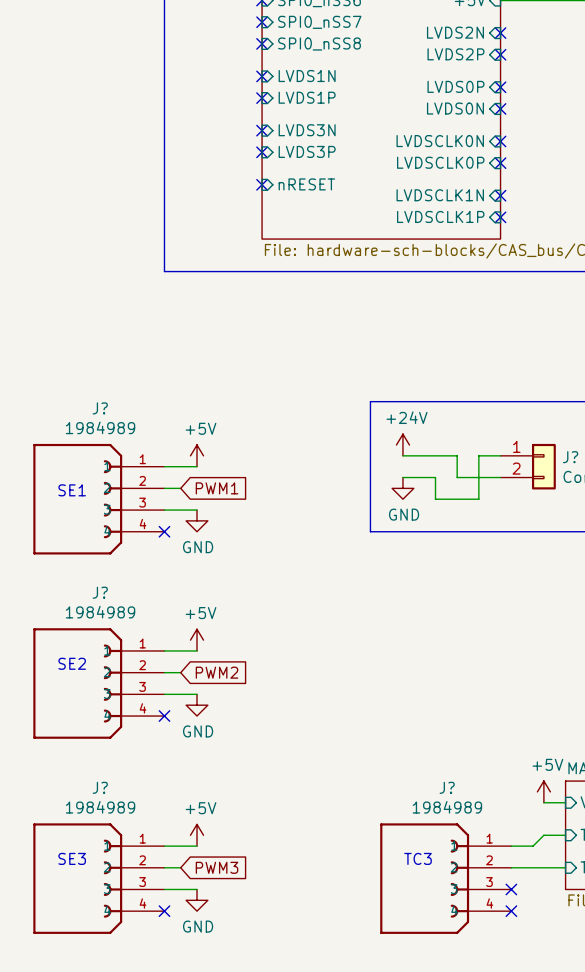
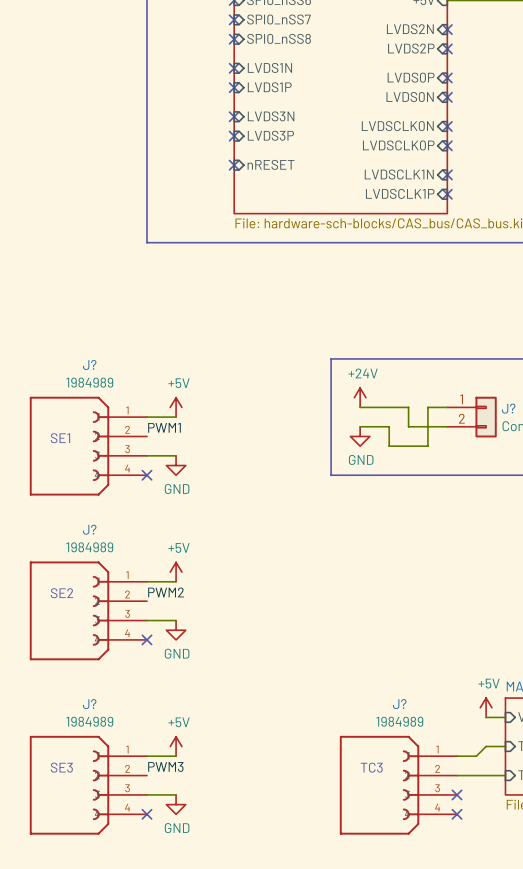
label: none -> PWM1 (164, 427)
wire: (164, 488) (180, 488) -> none
global label: PWM1 (217, 488) -> none
label: none -> PWM2 (166, 592)
wire: (164, 672) (180, 672) -> none
global label: PWM2 (217, 672) -> none
label: none -> PWM3 (165, 766)
wire: (164, 867) (180, 867) -> none
global label: PWM3 (217, 867) -> none

